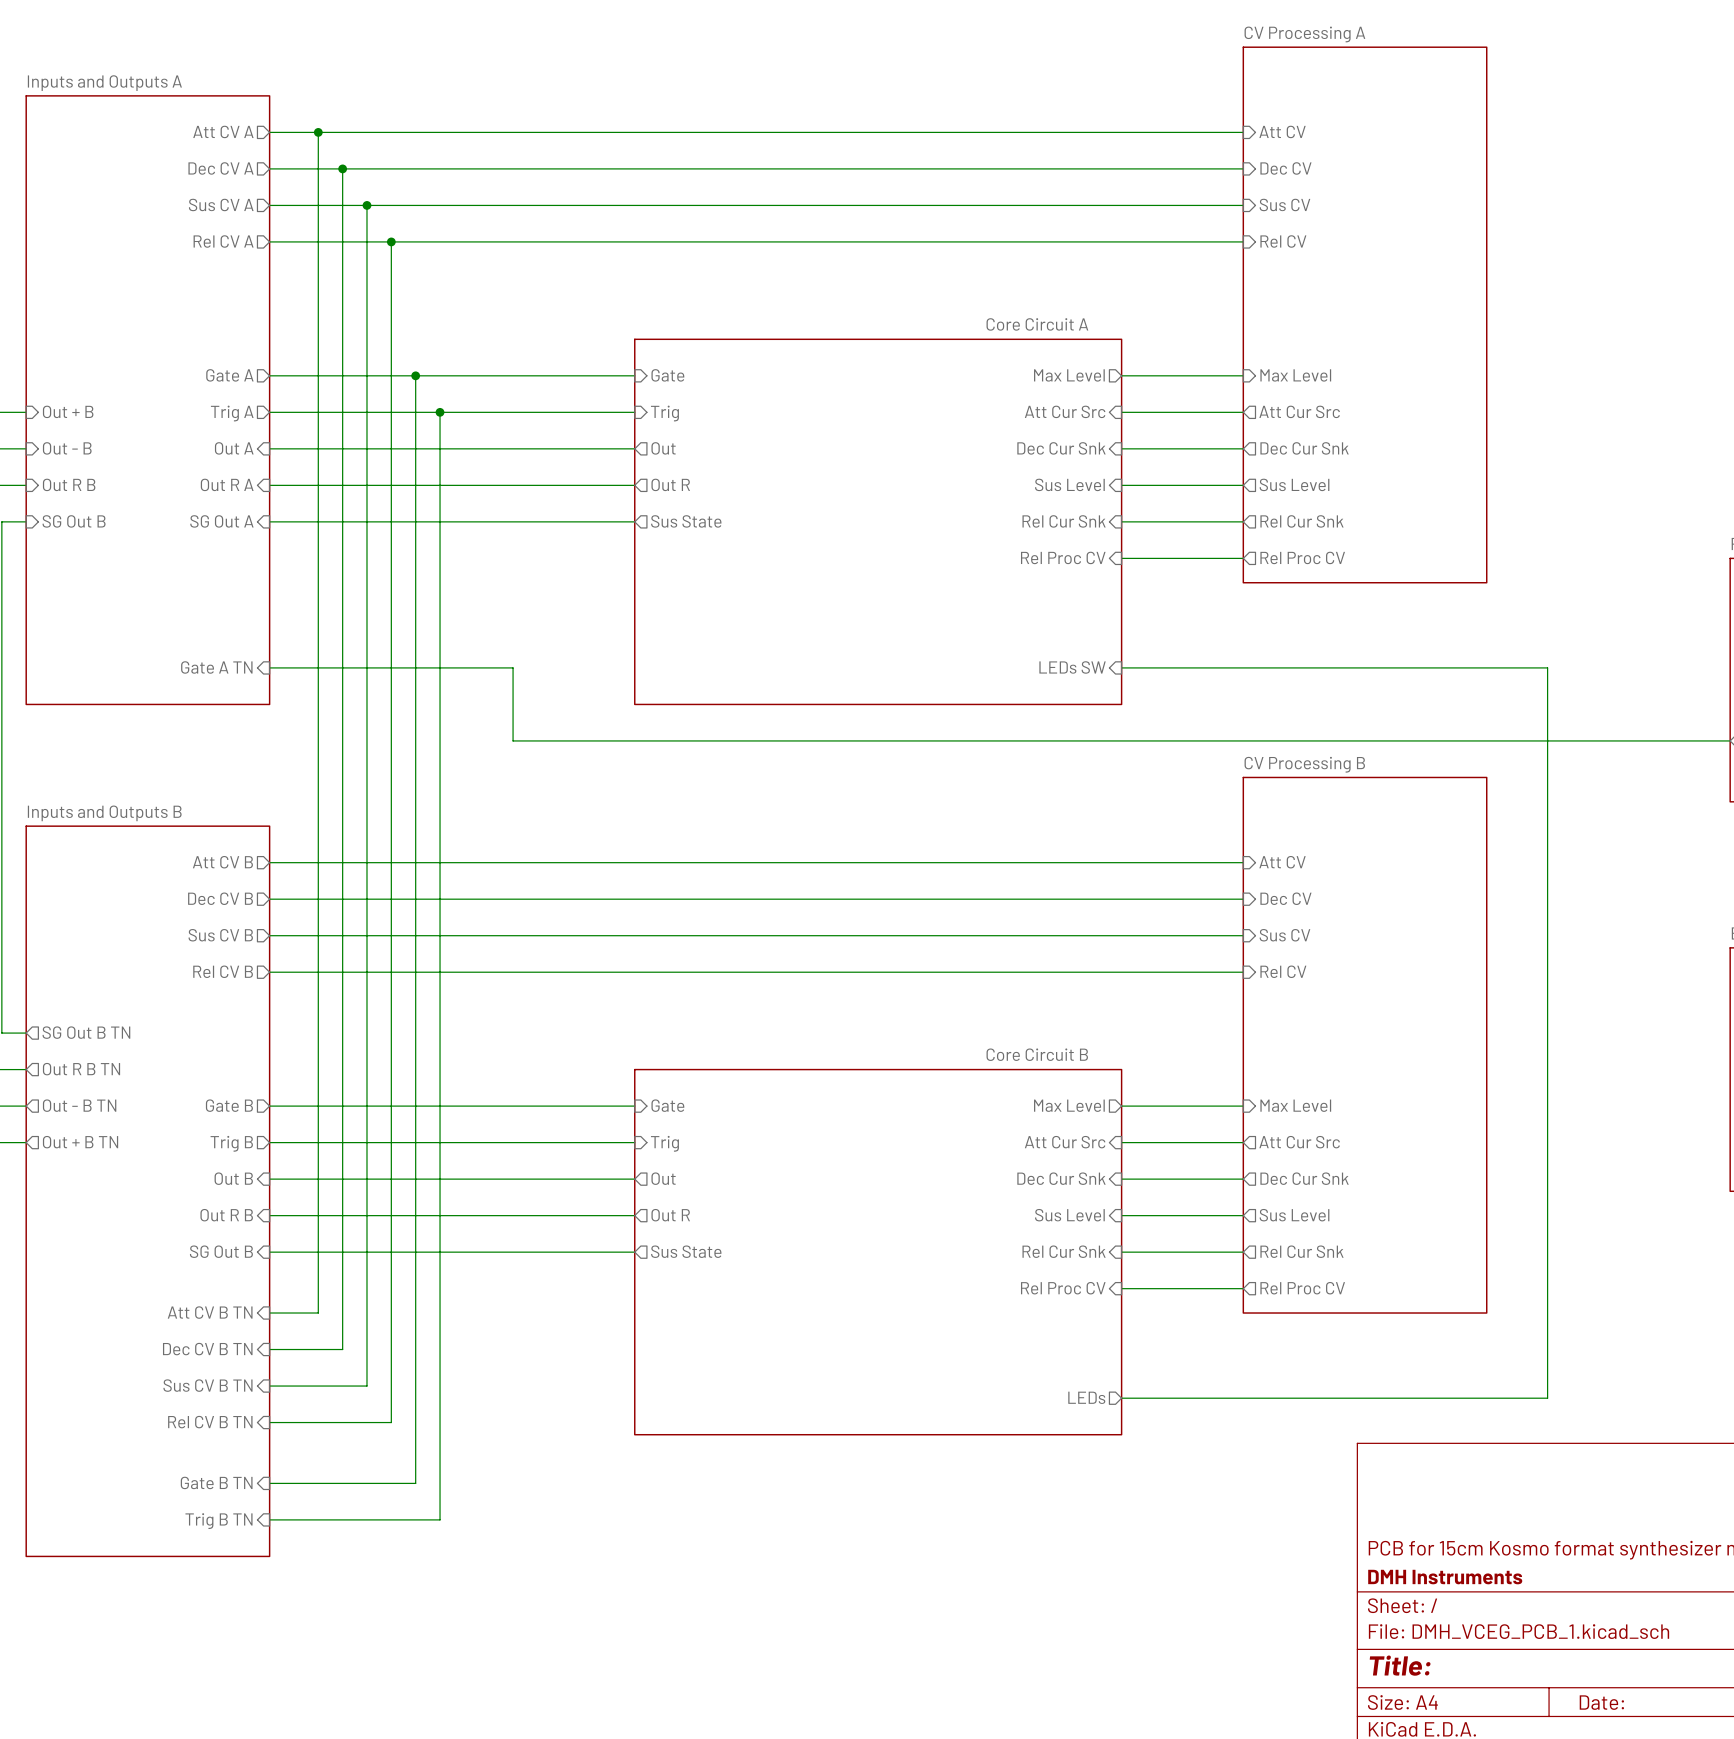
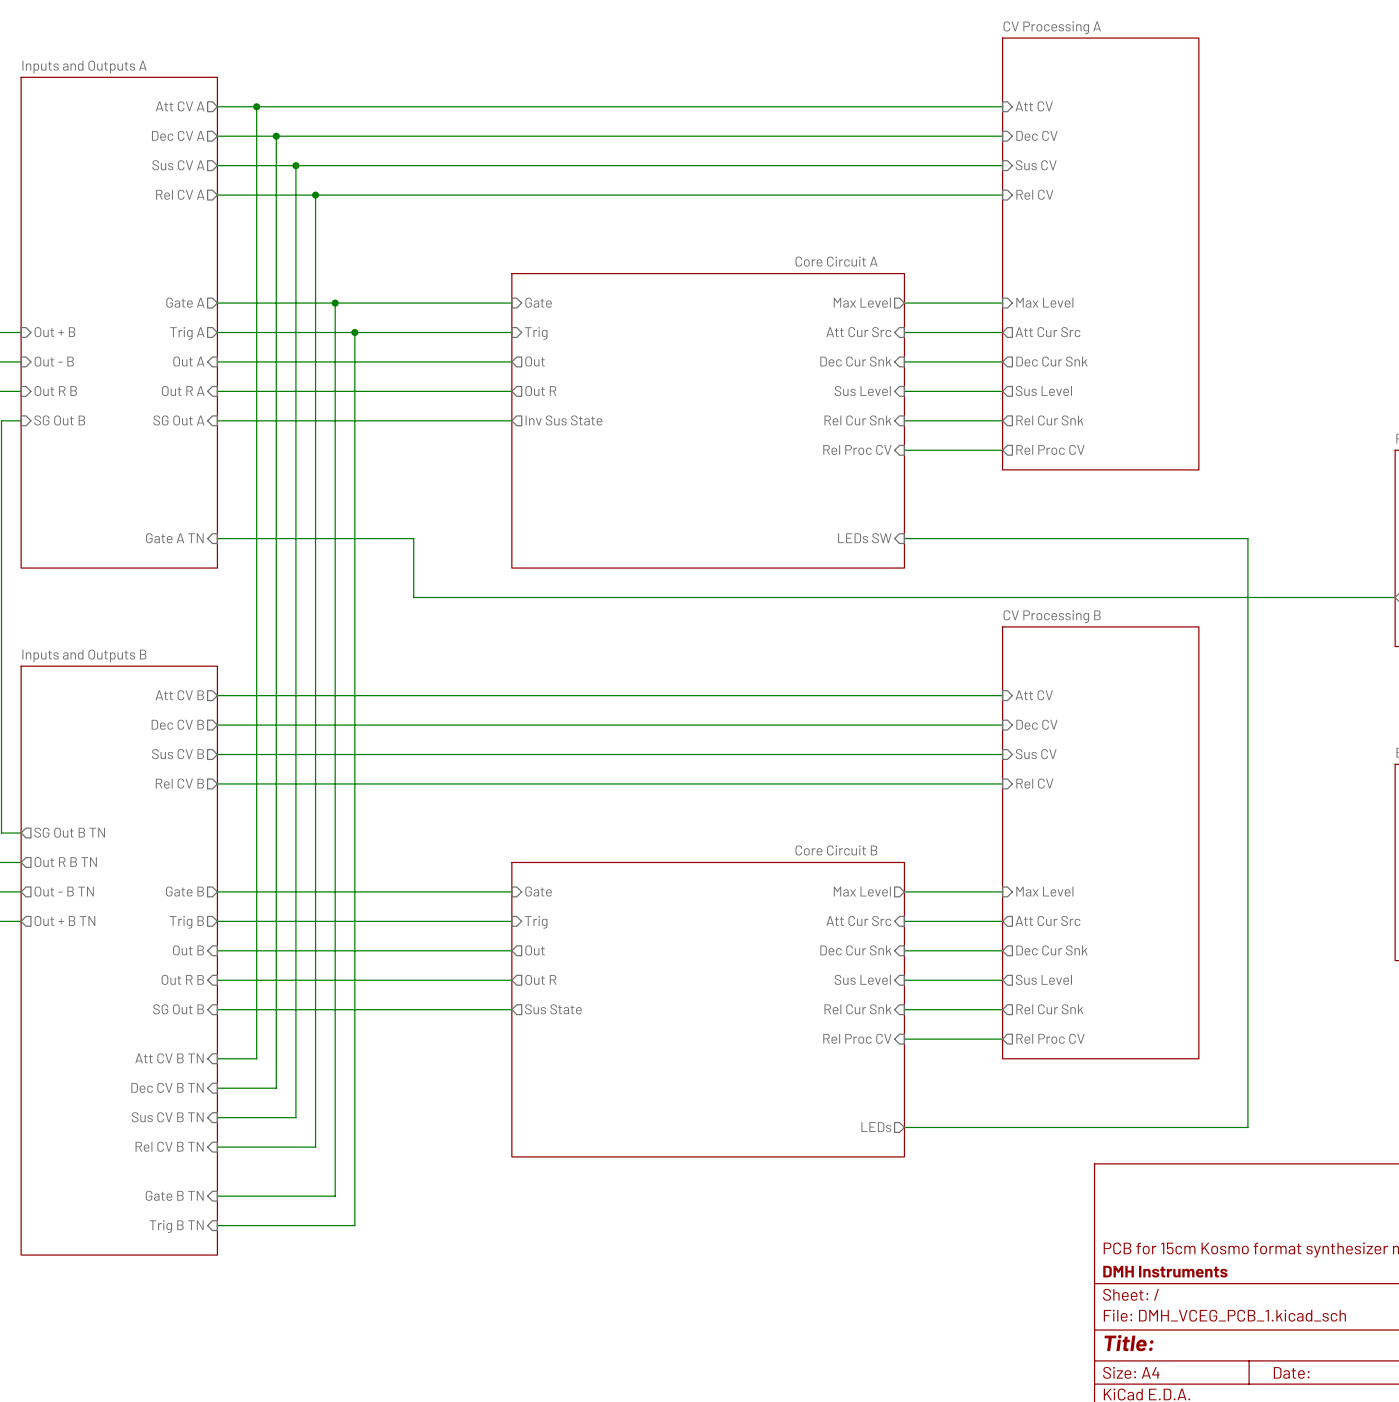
sheet pin: Sus State (686, 521) -> Inv Sus State (564, 420)

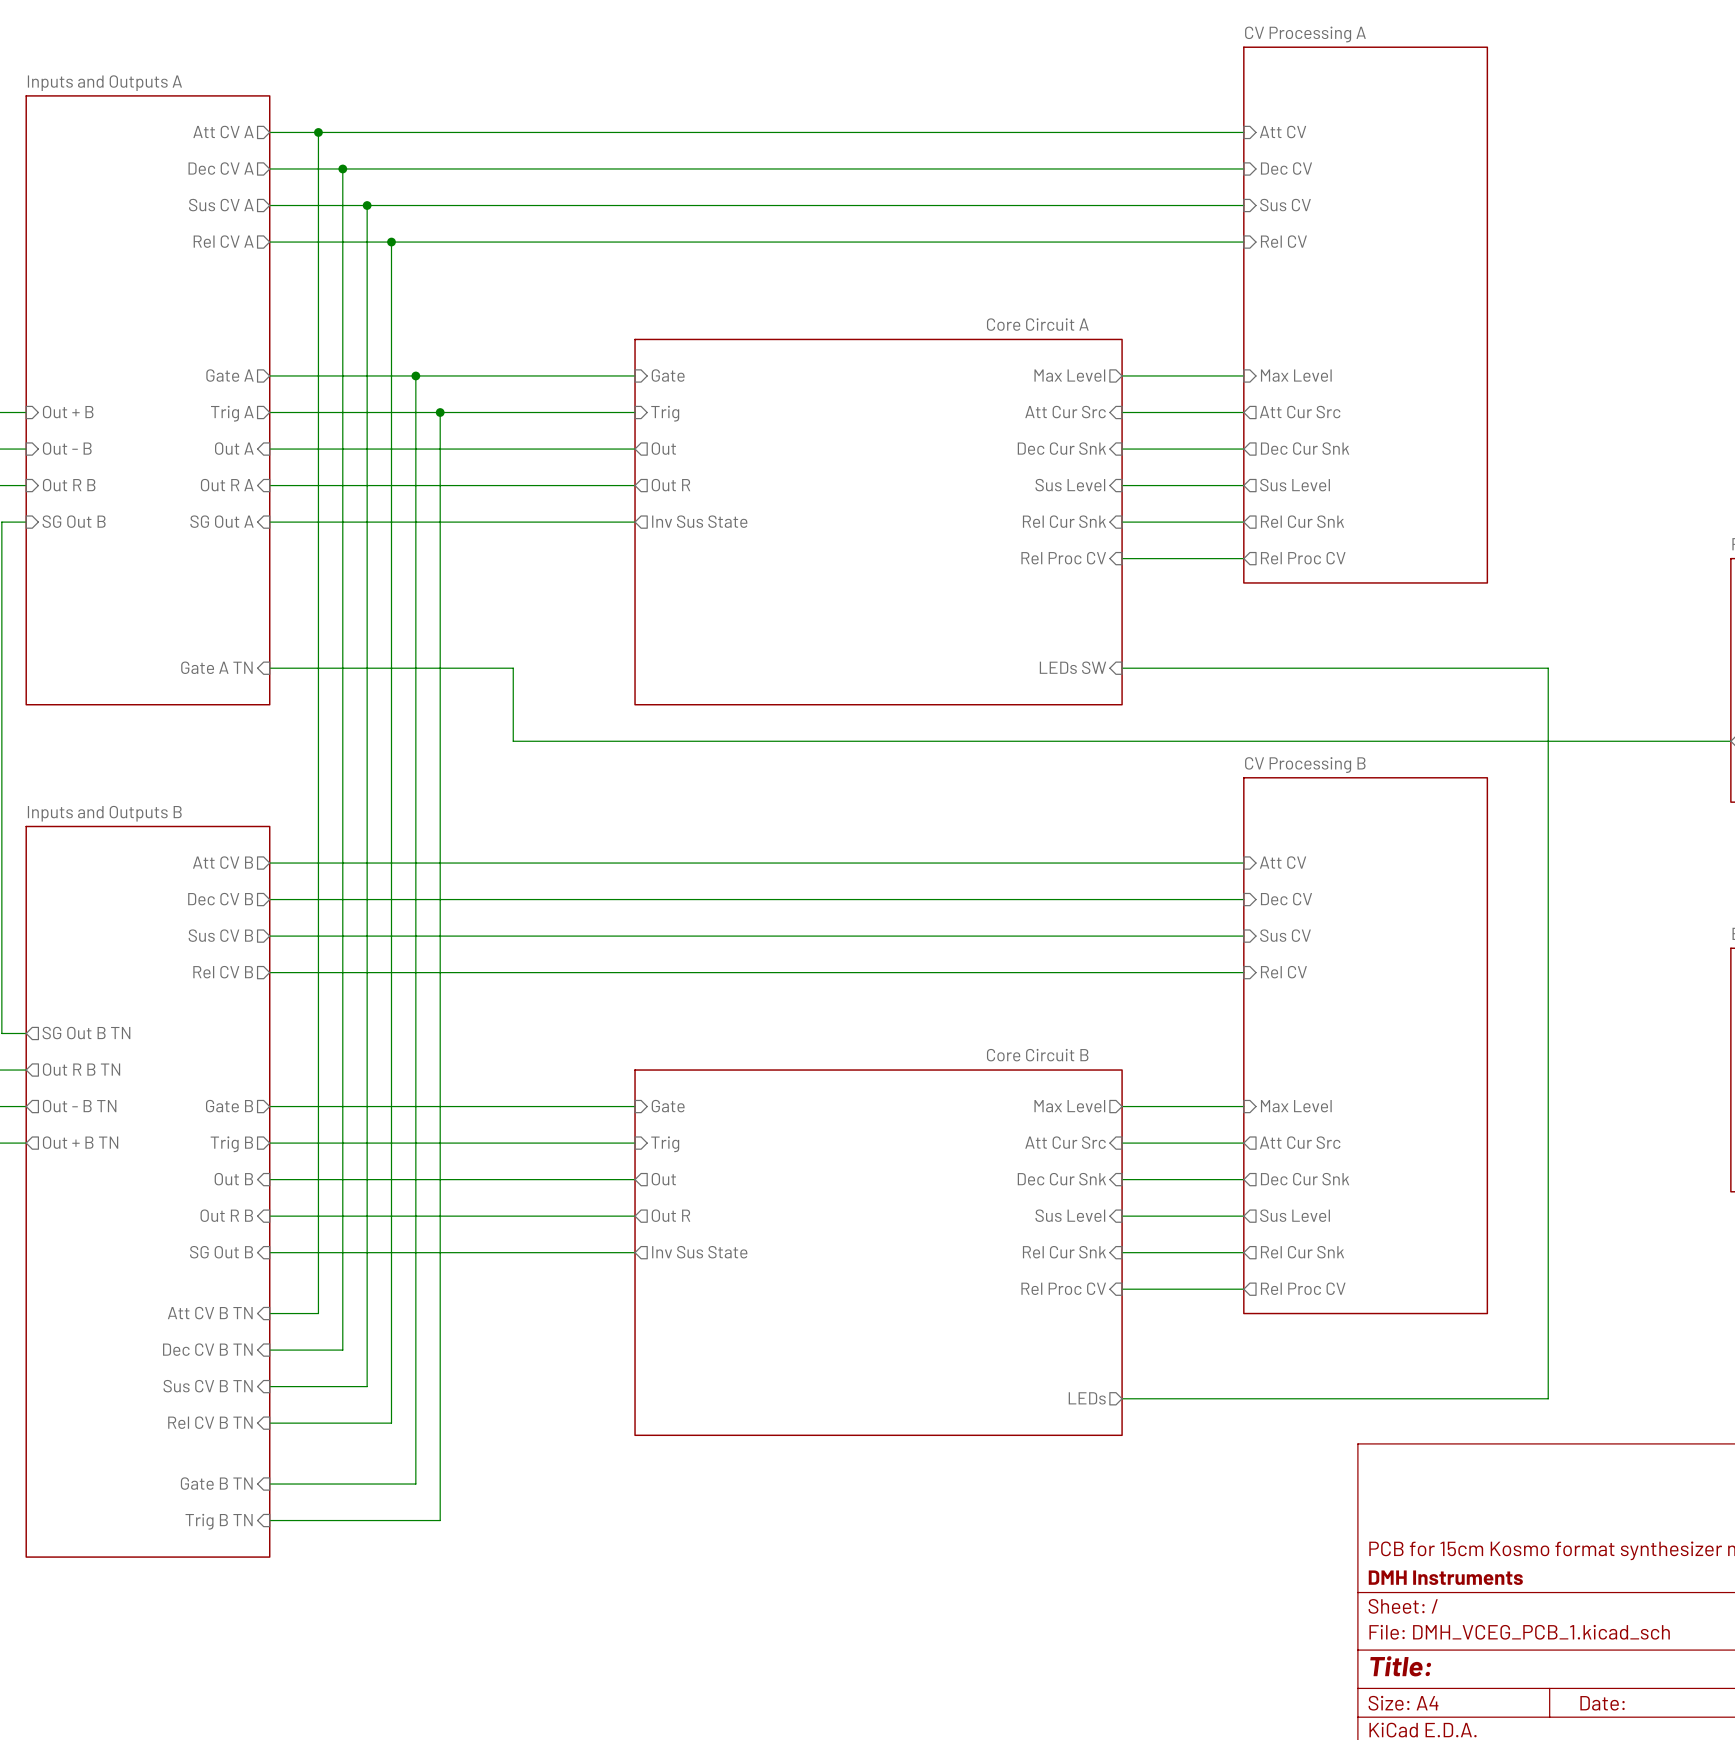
sheet pin: Sus State (553, 1009) -> Inv Sus State (699, 1252)

